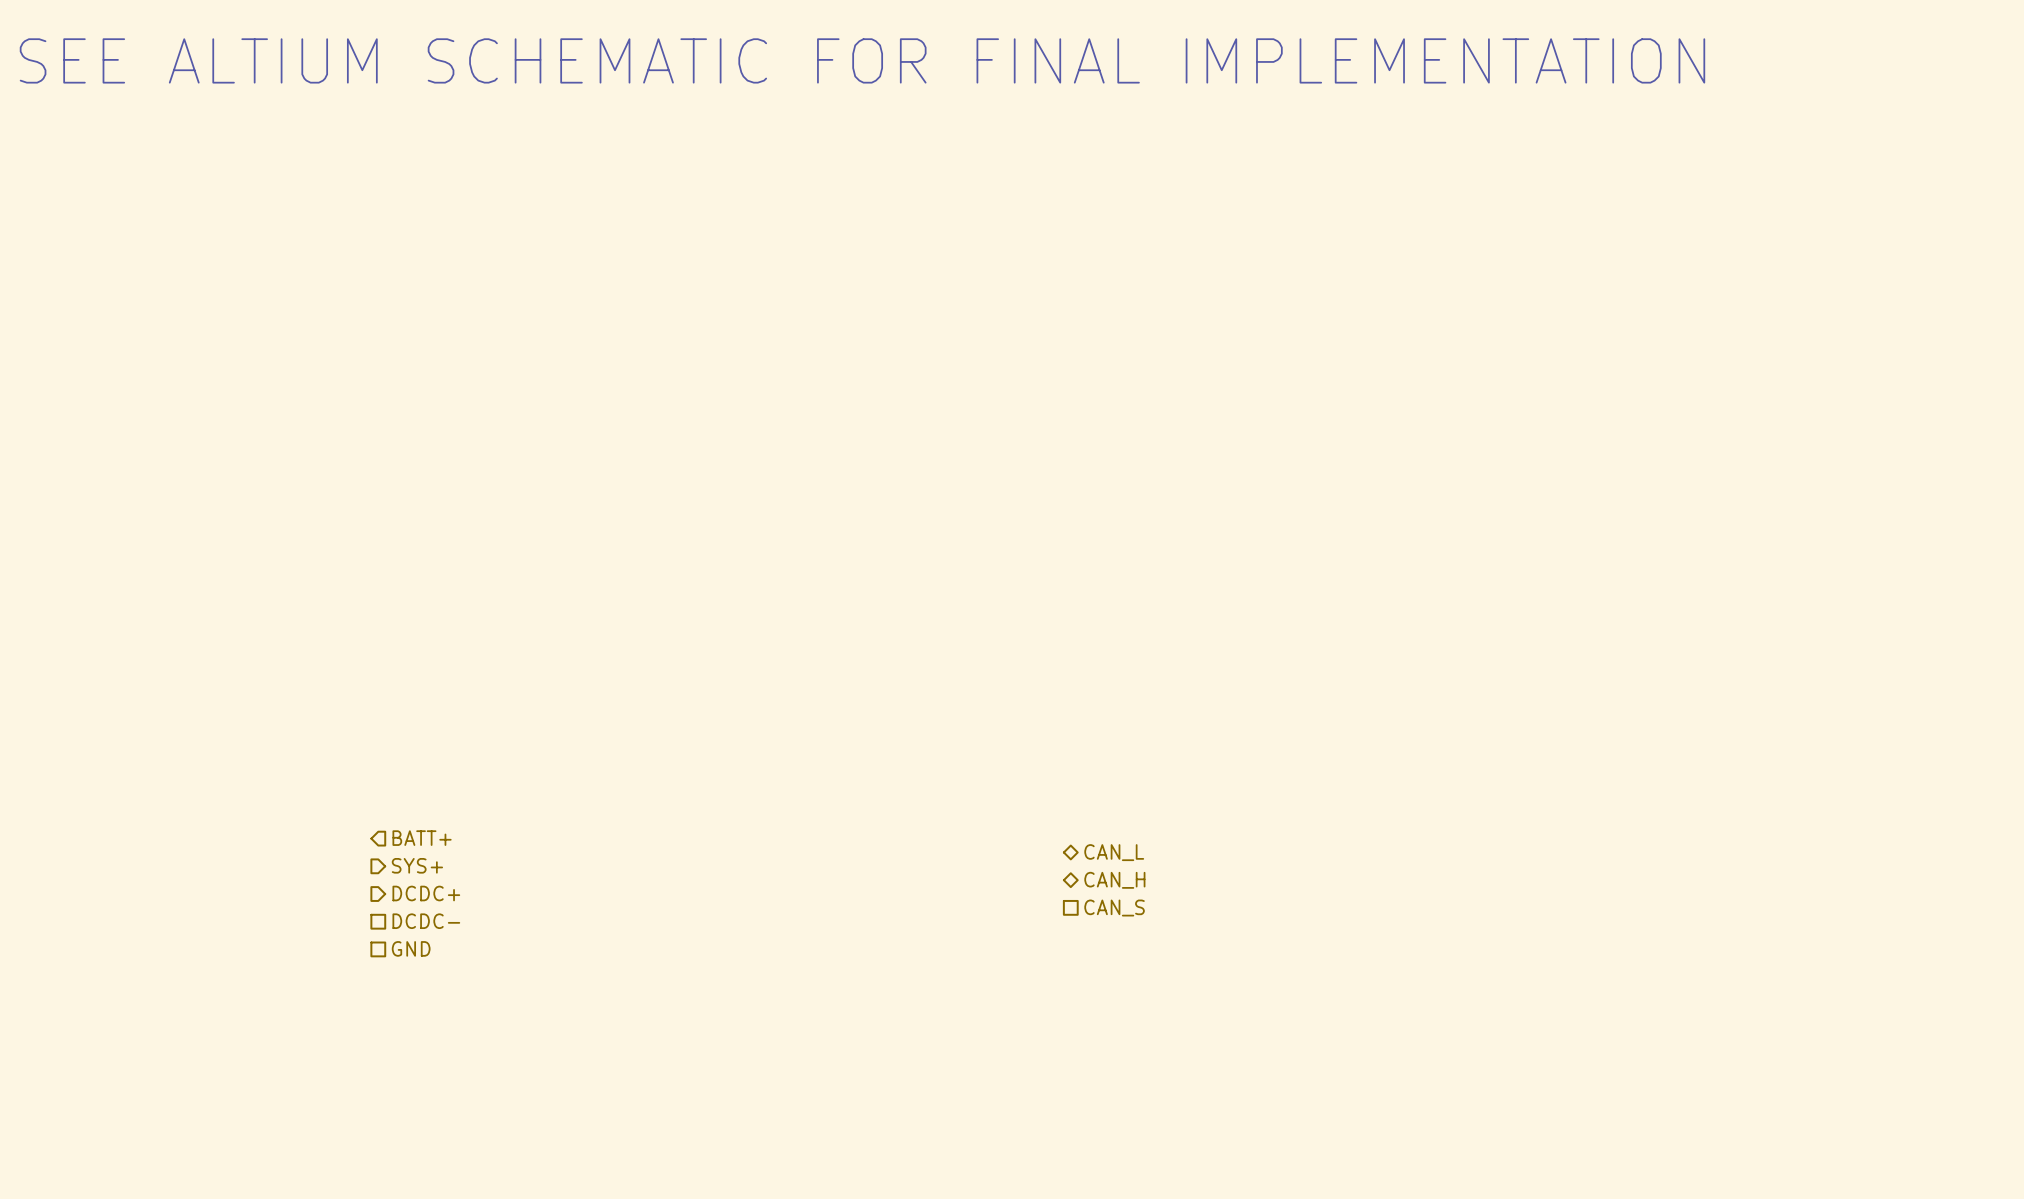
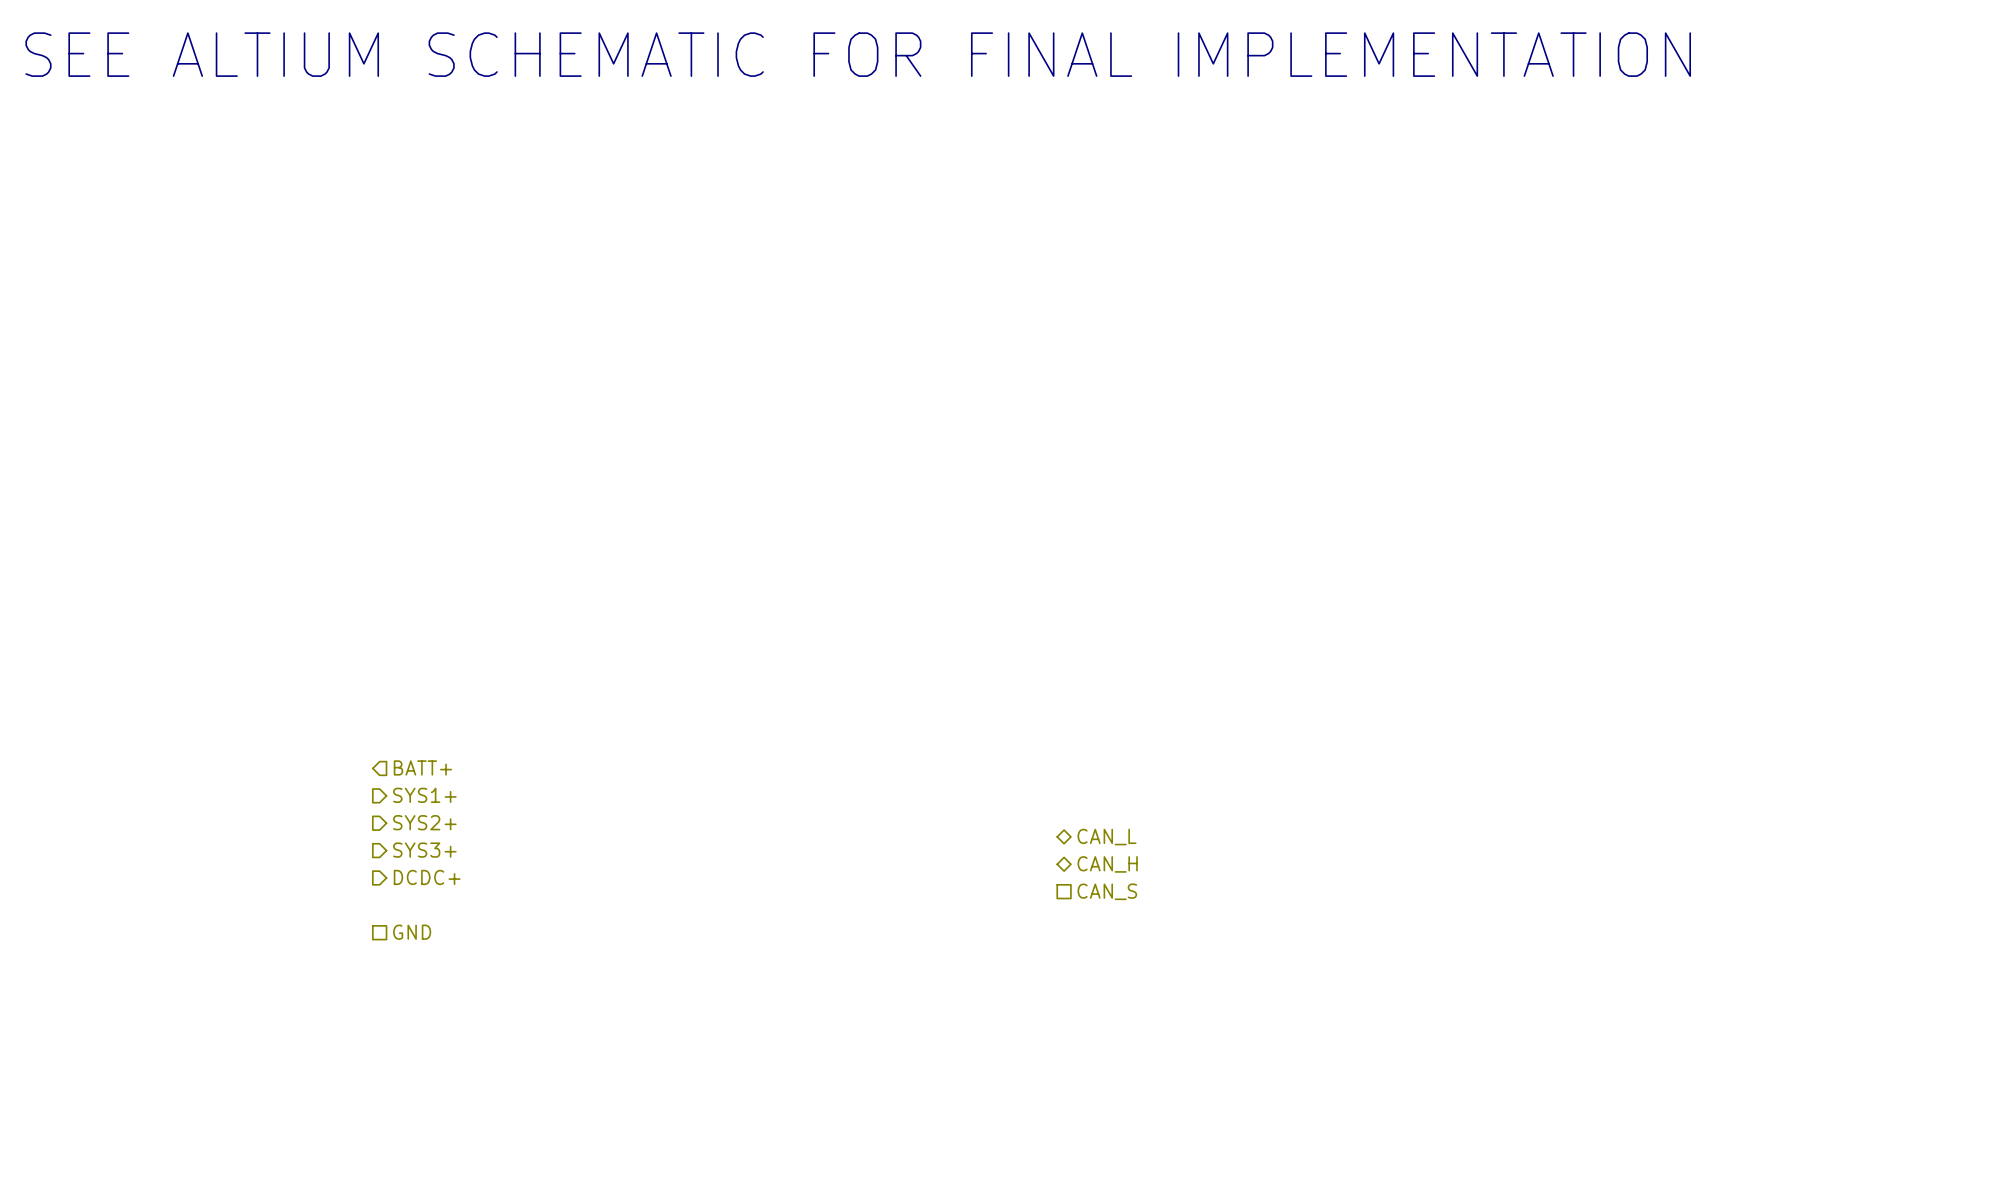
hierarchical label: none -> BATT+ (422, 767)
hierarchical label: none -> SYS1+ (424, 795)
hierarchical label shape: input (422, 838) -> output (424, 822)
hierarchical label: BATT+ (422, 838) -> SYS2+ (424, 822)
hierarchical label: SYS+ (417, 865) -> SYS3+ (424, 850)
hierarchical label: DCDC- (426, 921) -> none

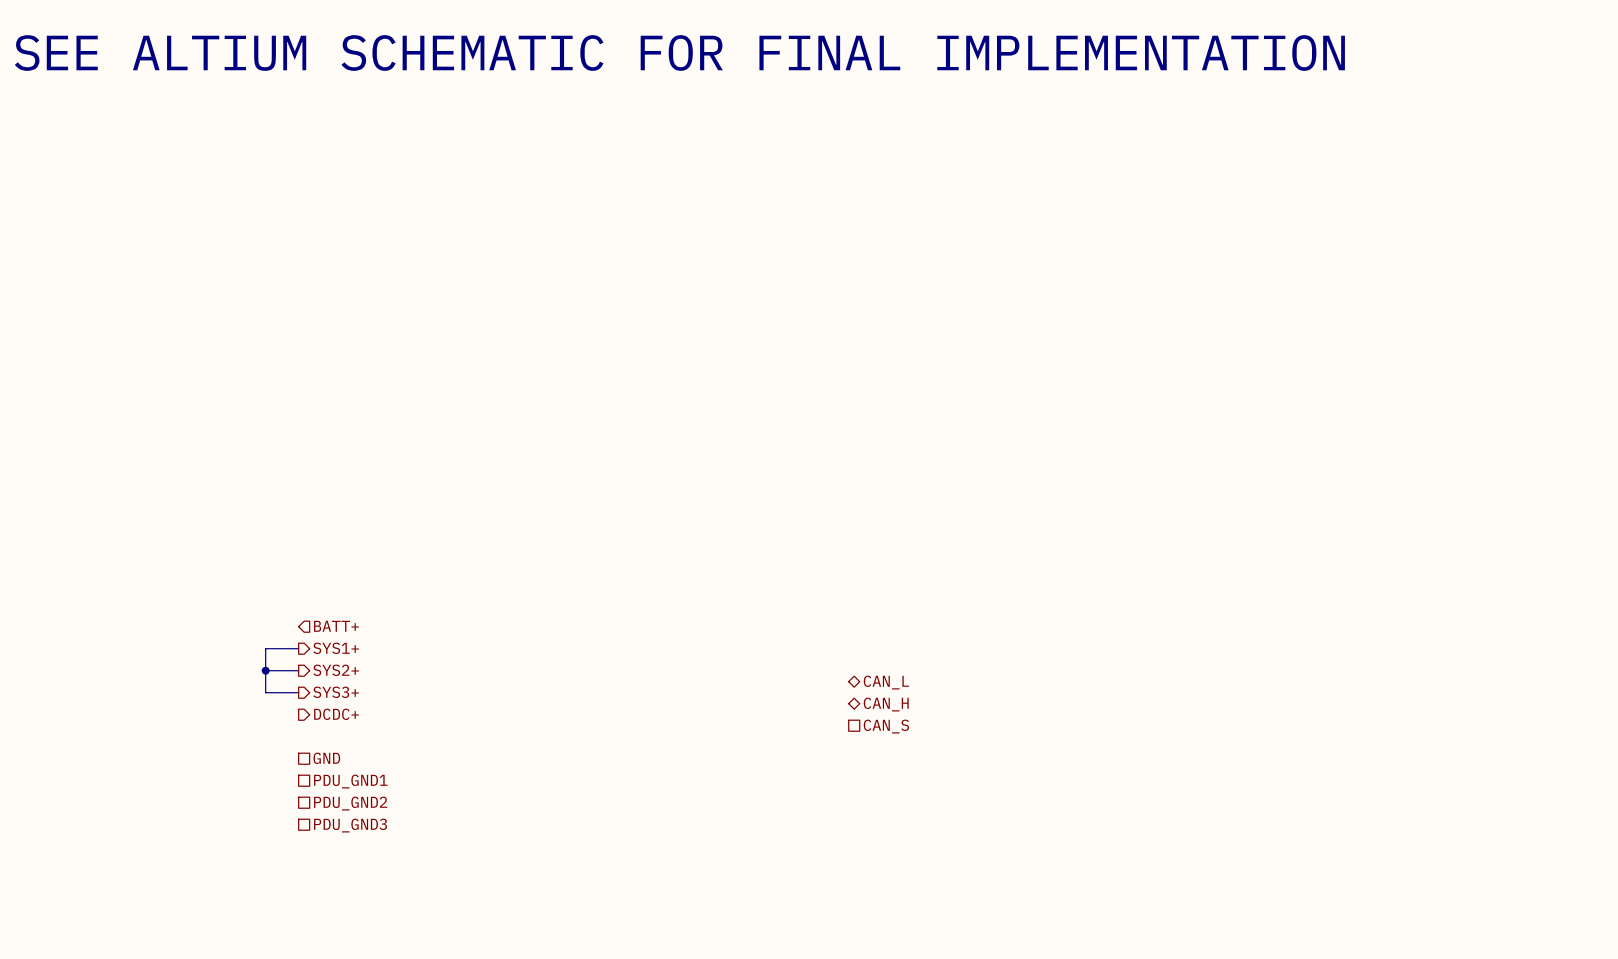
wire: none -> (298, 648) (265, 648) (265, 692) (298, 692)
wire: none -> (265, 670) (298, 670)
junction: none -> (265, 670)
hierarchical label: none -> PDU_GND1 (350, 781)
hierarchical label: none -> PDU_GND2 (350, 803)
hierarchical label: none -> PDU_GND3 (350, 825)

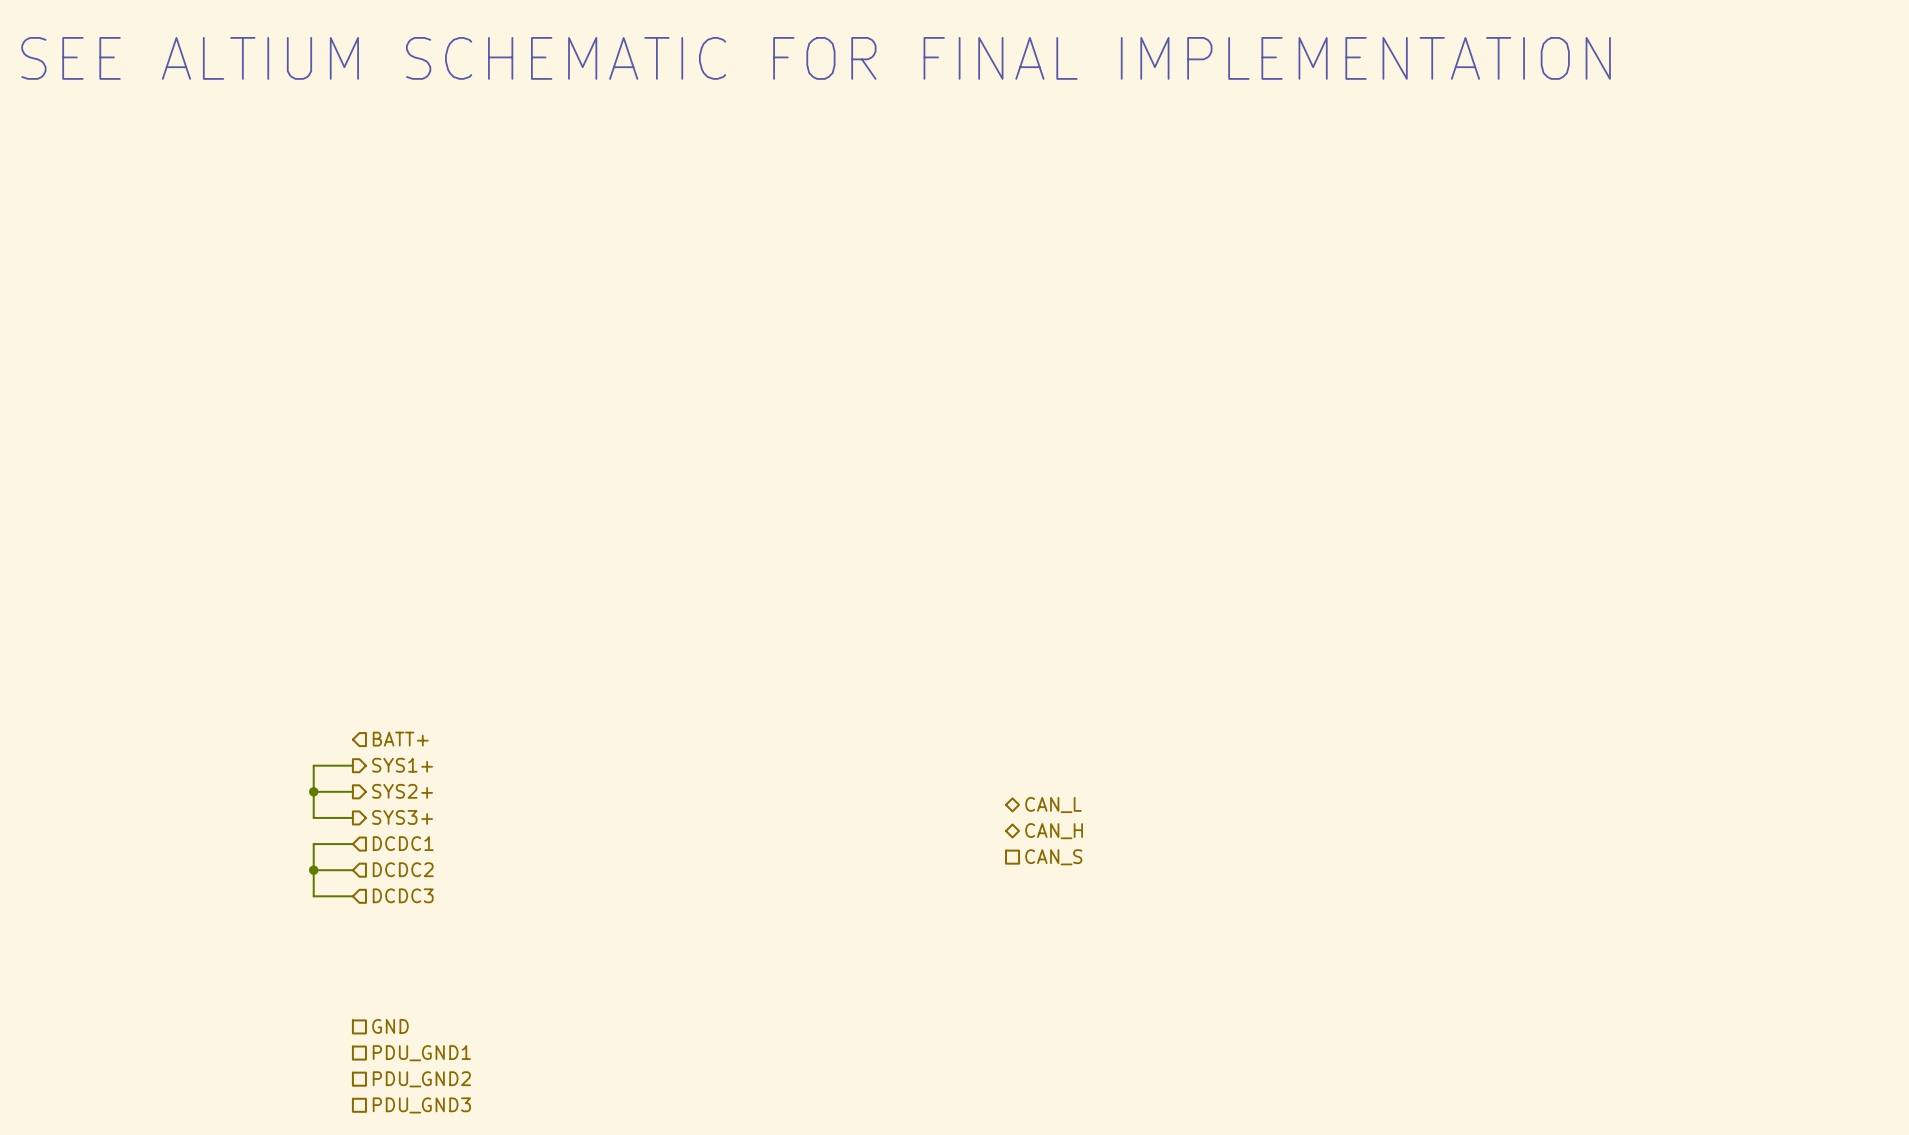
wire: none -> (352, 844) (313, 844) (313, 896) (352, 896)
hierarchical label shape: output (336, 714) -> input (403, 843)
hierarchical label: DCDC+ (336, 714) -> DCDC1 (403, 843)
wire: none -> (313, 870) (352, 870)
junction: none -> (313, 870)
hierarchical label: none -> DCDC2 (403, 869)
hierarchical label shape: passive (326, 758) -> input (403, 895)
hierarchical label: GND (326, 758) -> DCDC3 (403, 895)
hierarchical label position: PDU_GND1 (350, 781) -> PDU_GND1 (421, 1053)
hierarchical label position: PDU_GND2 (350, 803) -> PDU_GND2 (421, 1079)
hierarchical label position: PDU_GND3 (350, 825) -> PDU_GND3 (421, 1105)
hierarchical label: none -> GND (390, 1026)

